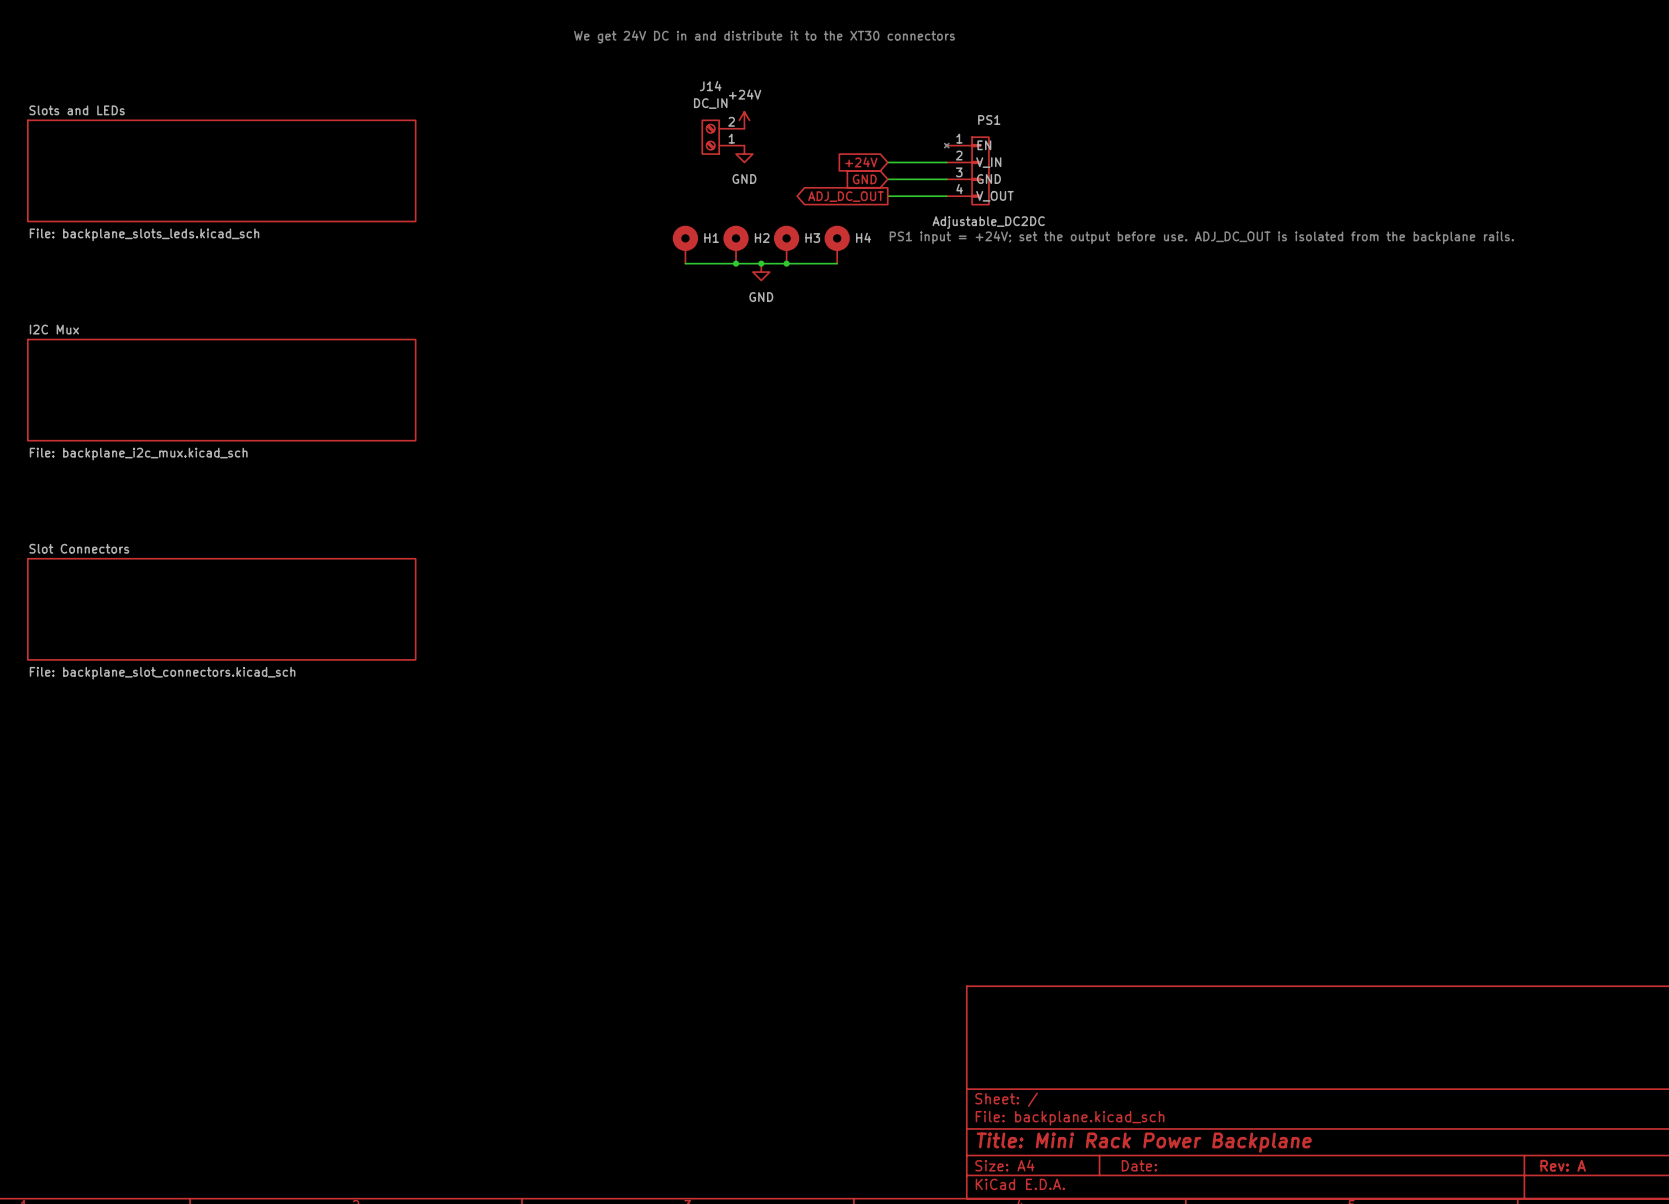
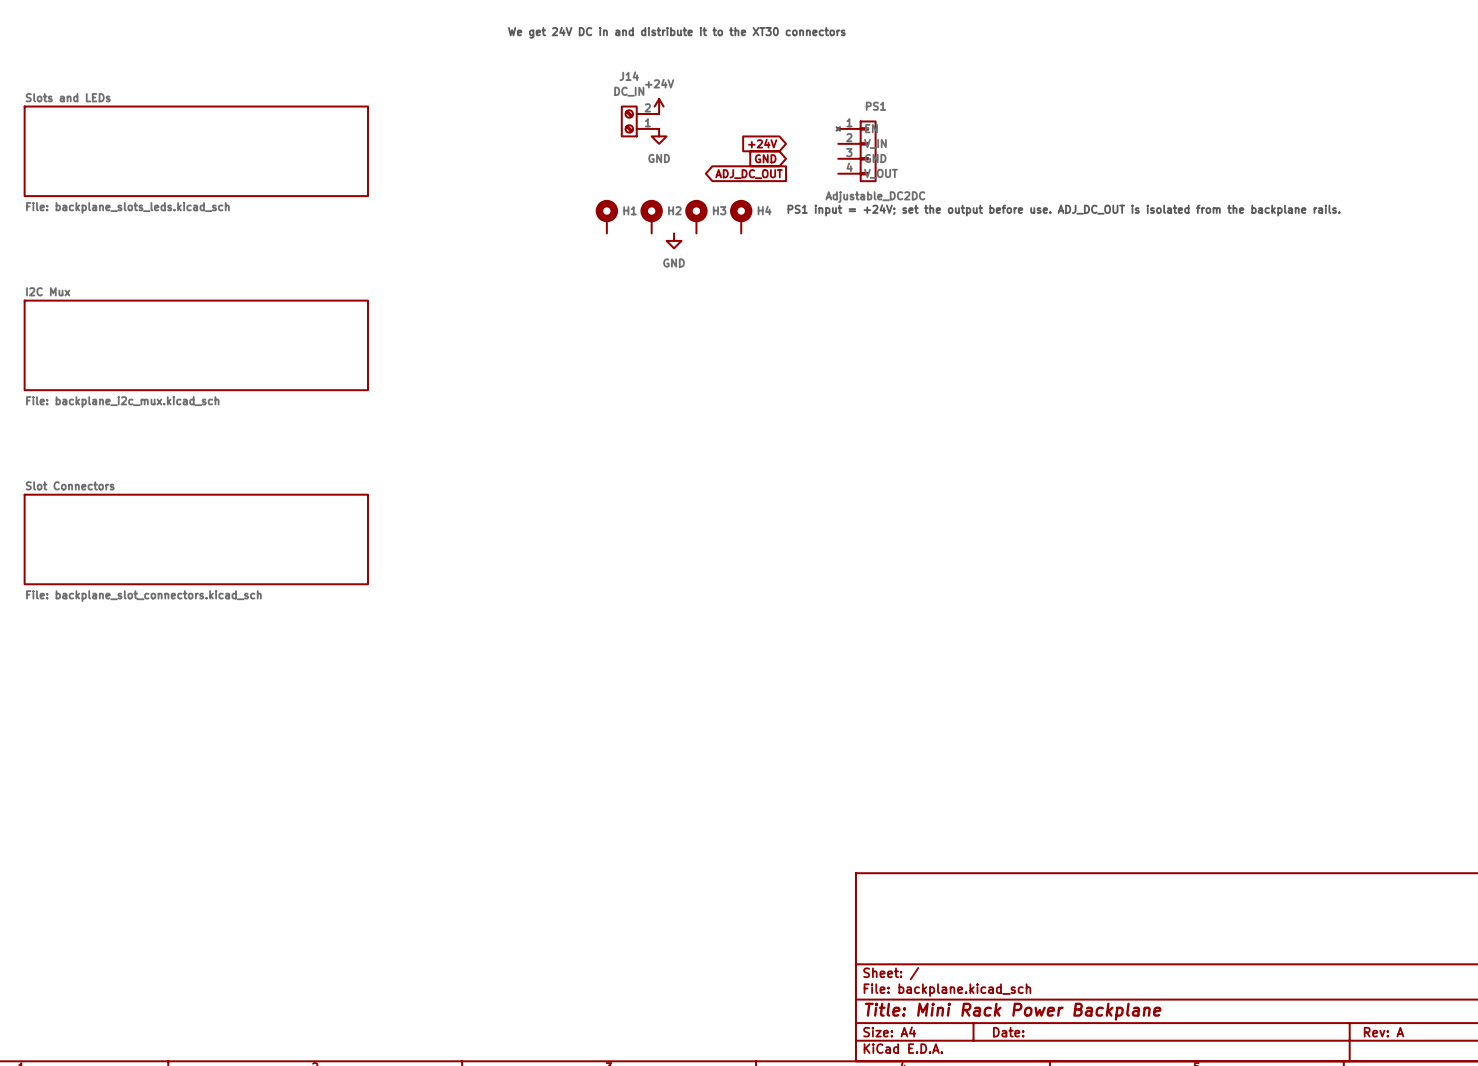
wire: (887, 162) (946, 162) -> none
wire: (887, 179) (946, 179) -> none
wire: (887, 196) (946, 196) -> none
wire: (685, 263) (837, 263) -> none
junction: (736, 263) -> none
junction: (761, 263) -> none
junction: (786, 263) -> none

